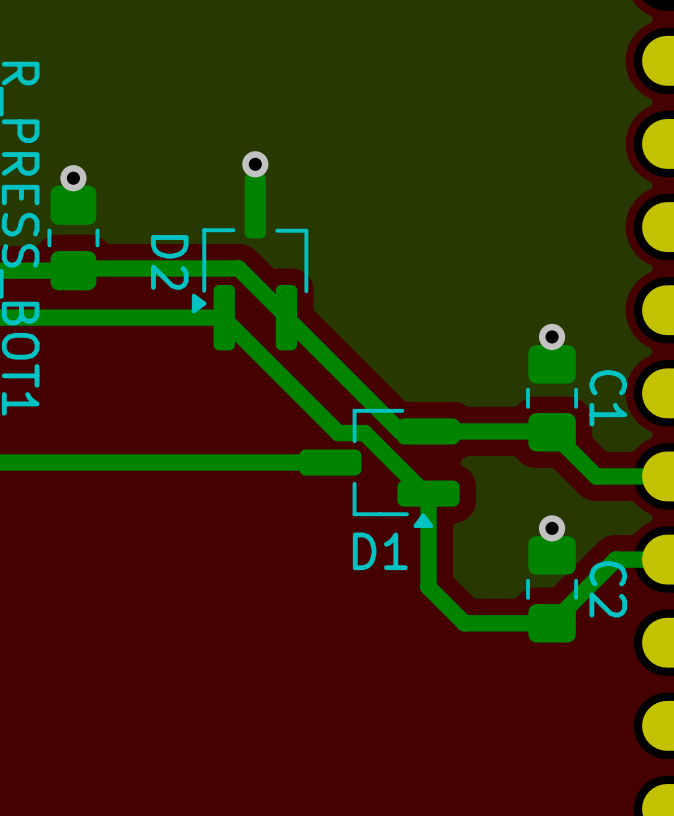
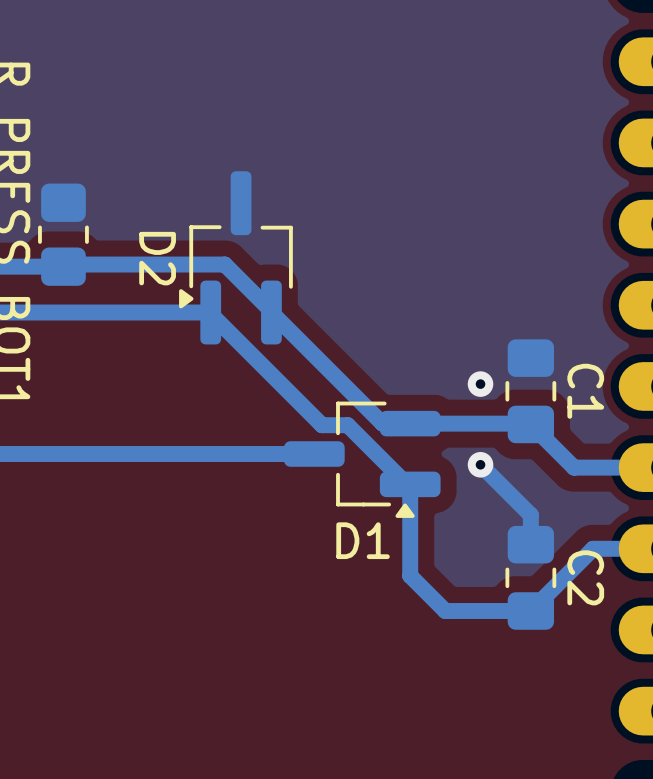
via: (255, 164) -> none
via: (73, 178) -> none
via: (552, 336) -> none
via: none -> (480, 384)
bottom track: none -> (480, 464) (530, 515) (530, 544)
via: none -> (480, 464)
via: (552, 528) -> none

